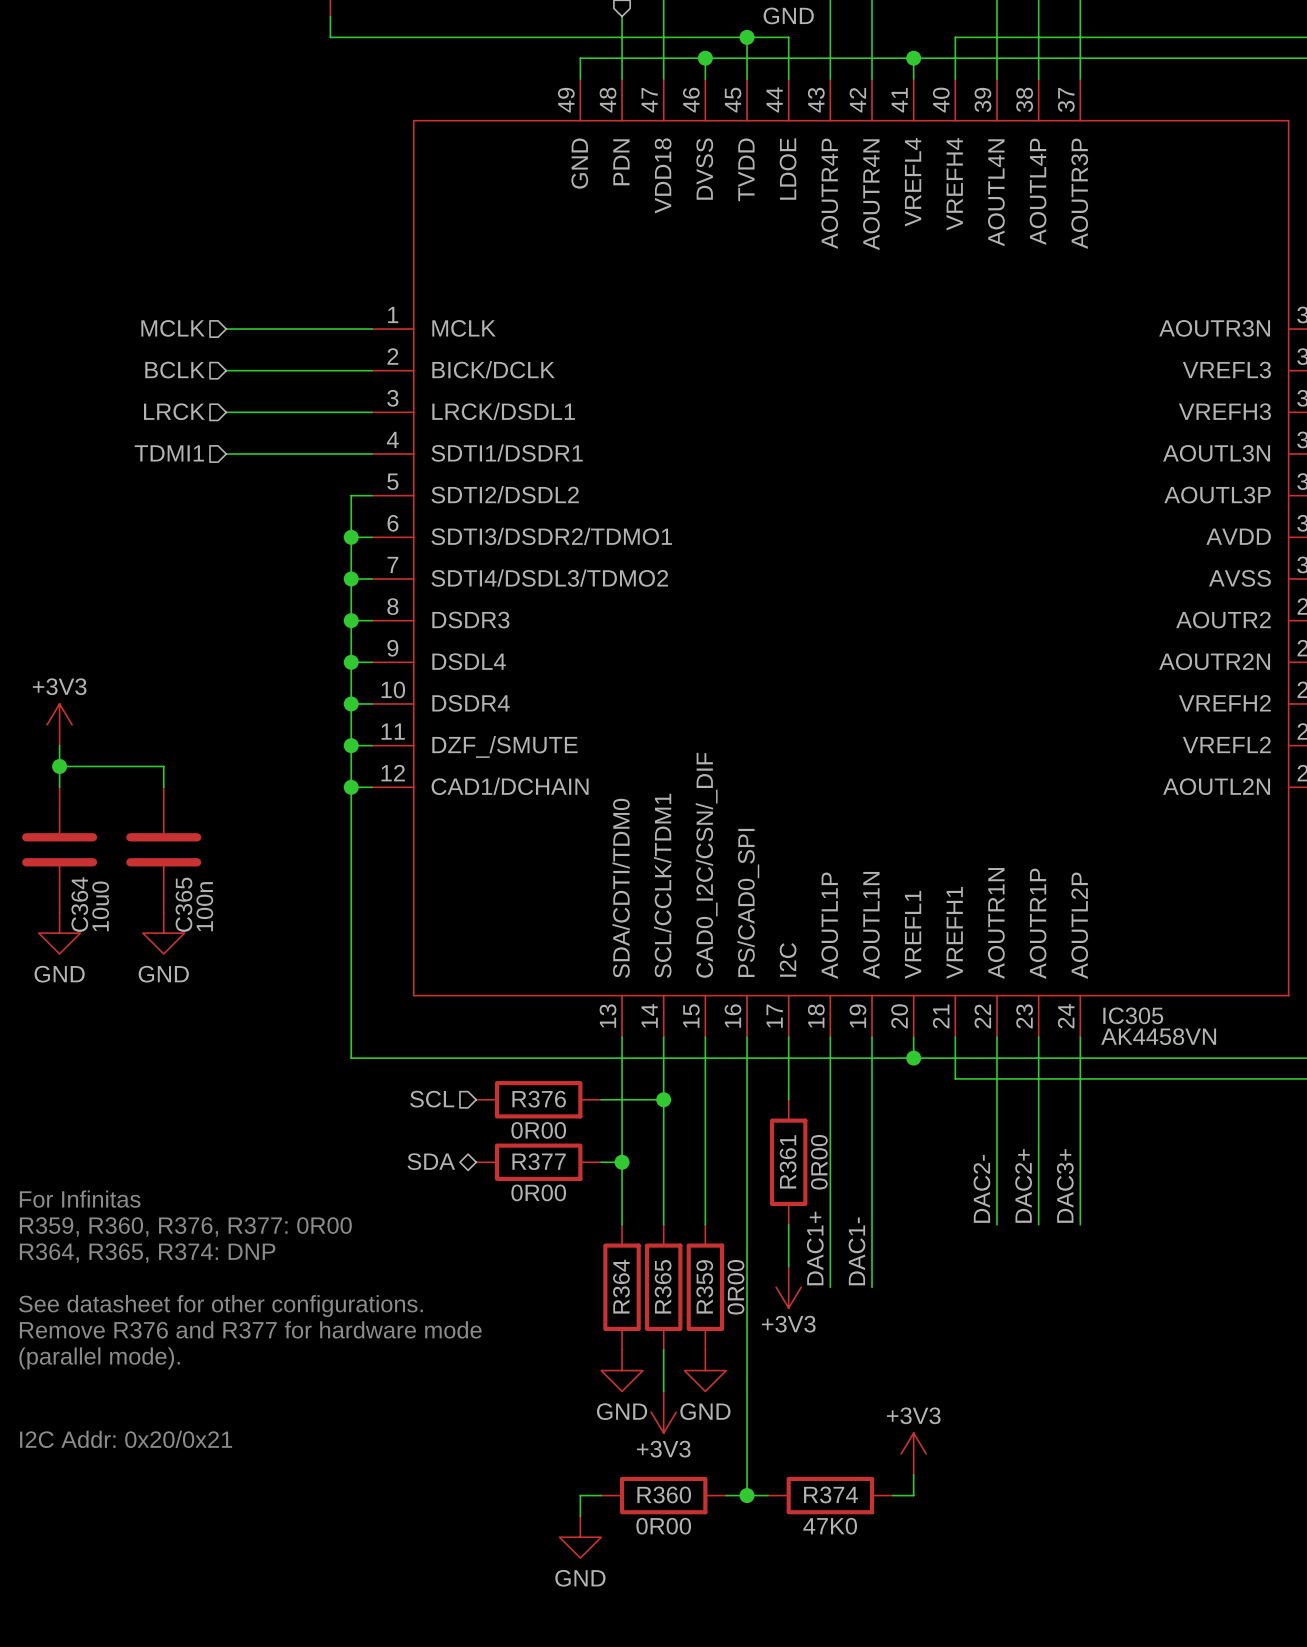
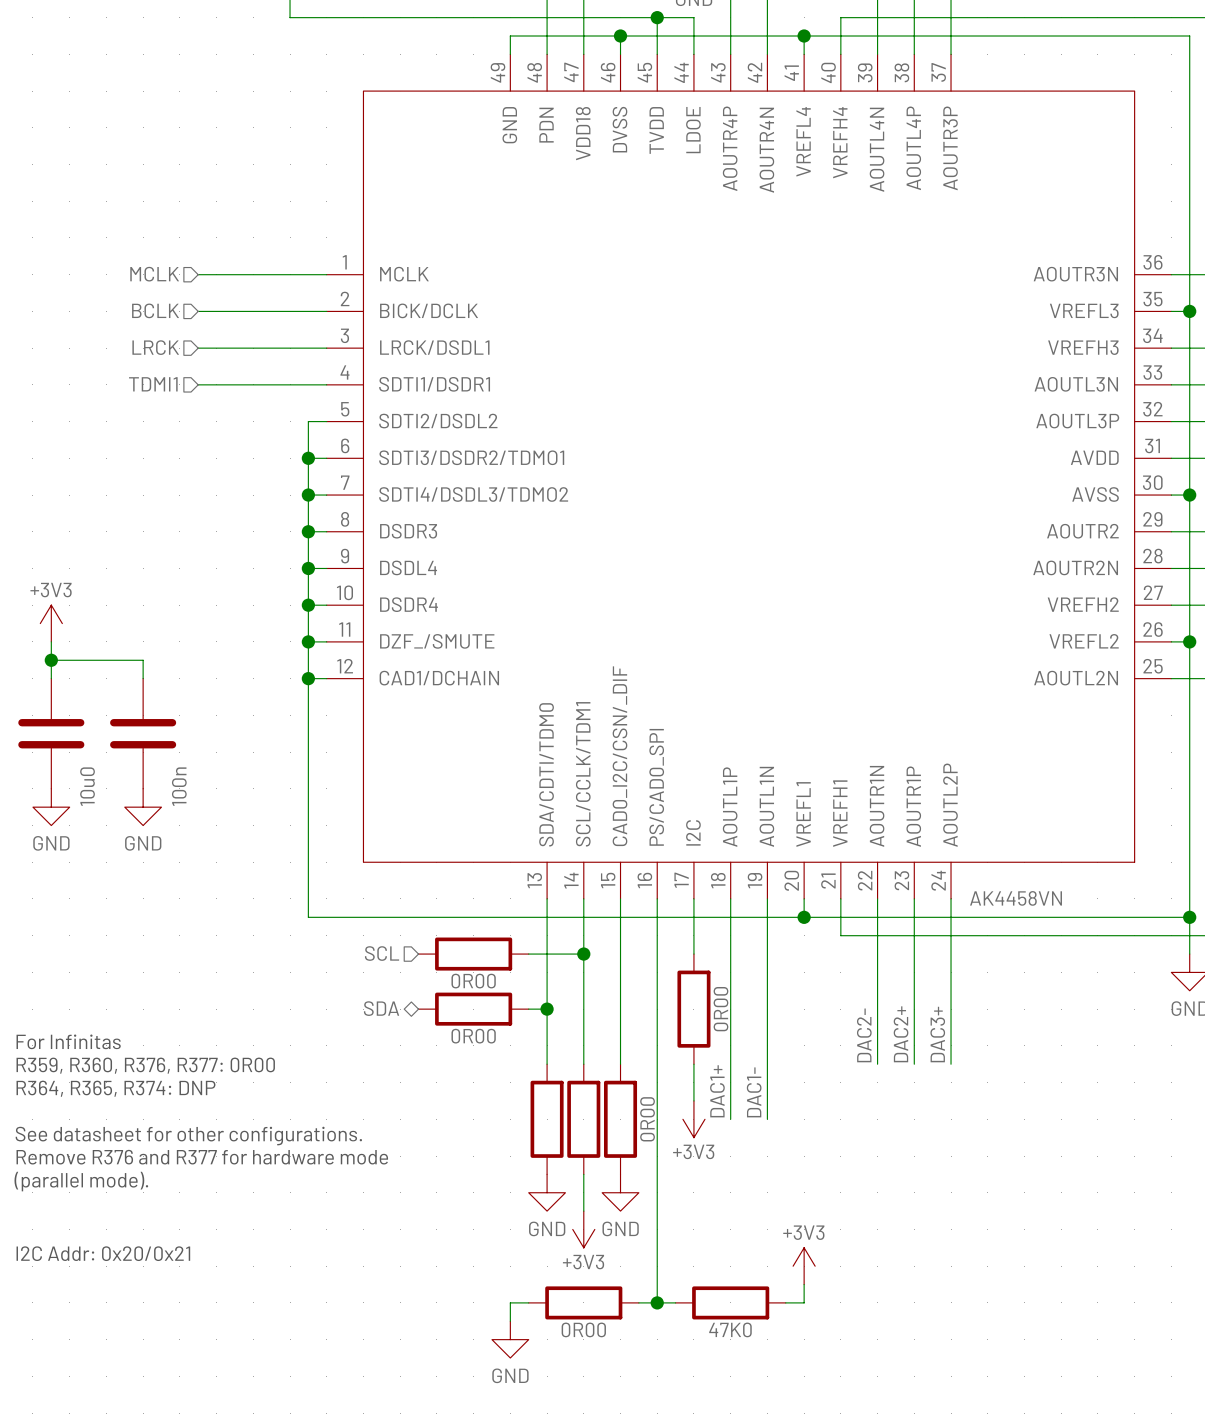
C364 name: C364 (79, 904) -> none
C365 name: C365 (183, 904) -> none
IC305 name: IC305 (1133, 1015) -> none
R376 name: R376 (539, 1099) -> none
R377 name: R377 (539, 1161) -> none
R361 name: R361 (788, 1161) -> none
R364 name: R364 (621, 1286) -> none
R365 name: R365 (663, 1286) -> none
R359 name: R359 (704, 1286) -> none
R360 name: R360 (664, 1494) -> none
R374 name: R374 (830, 1494) -> none

